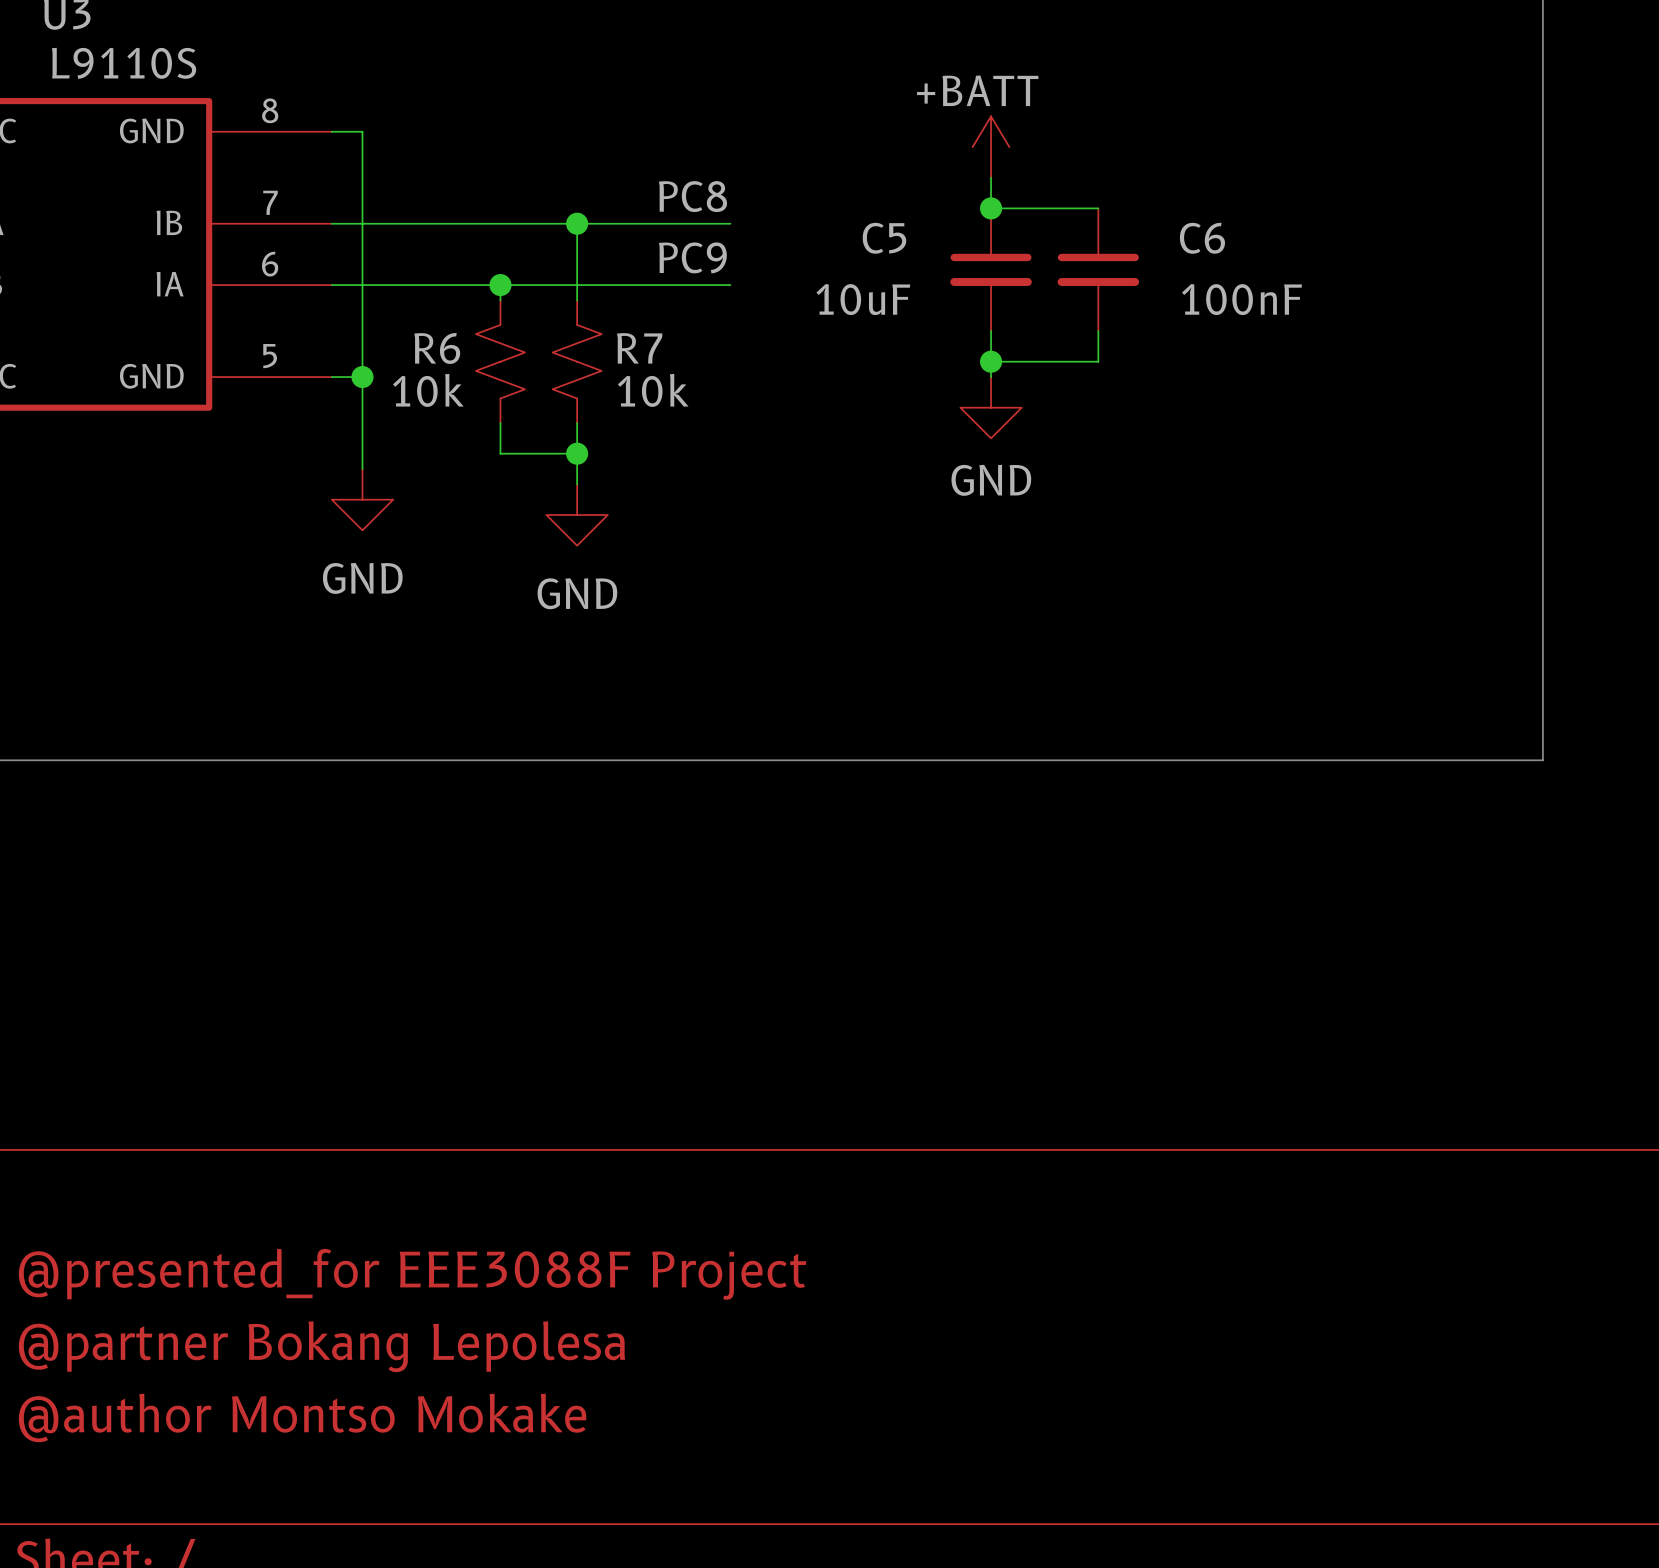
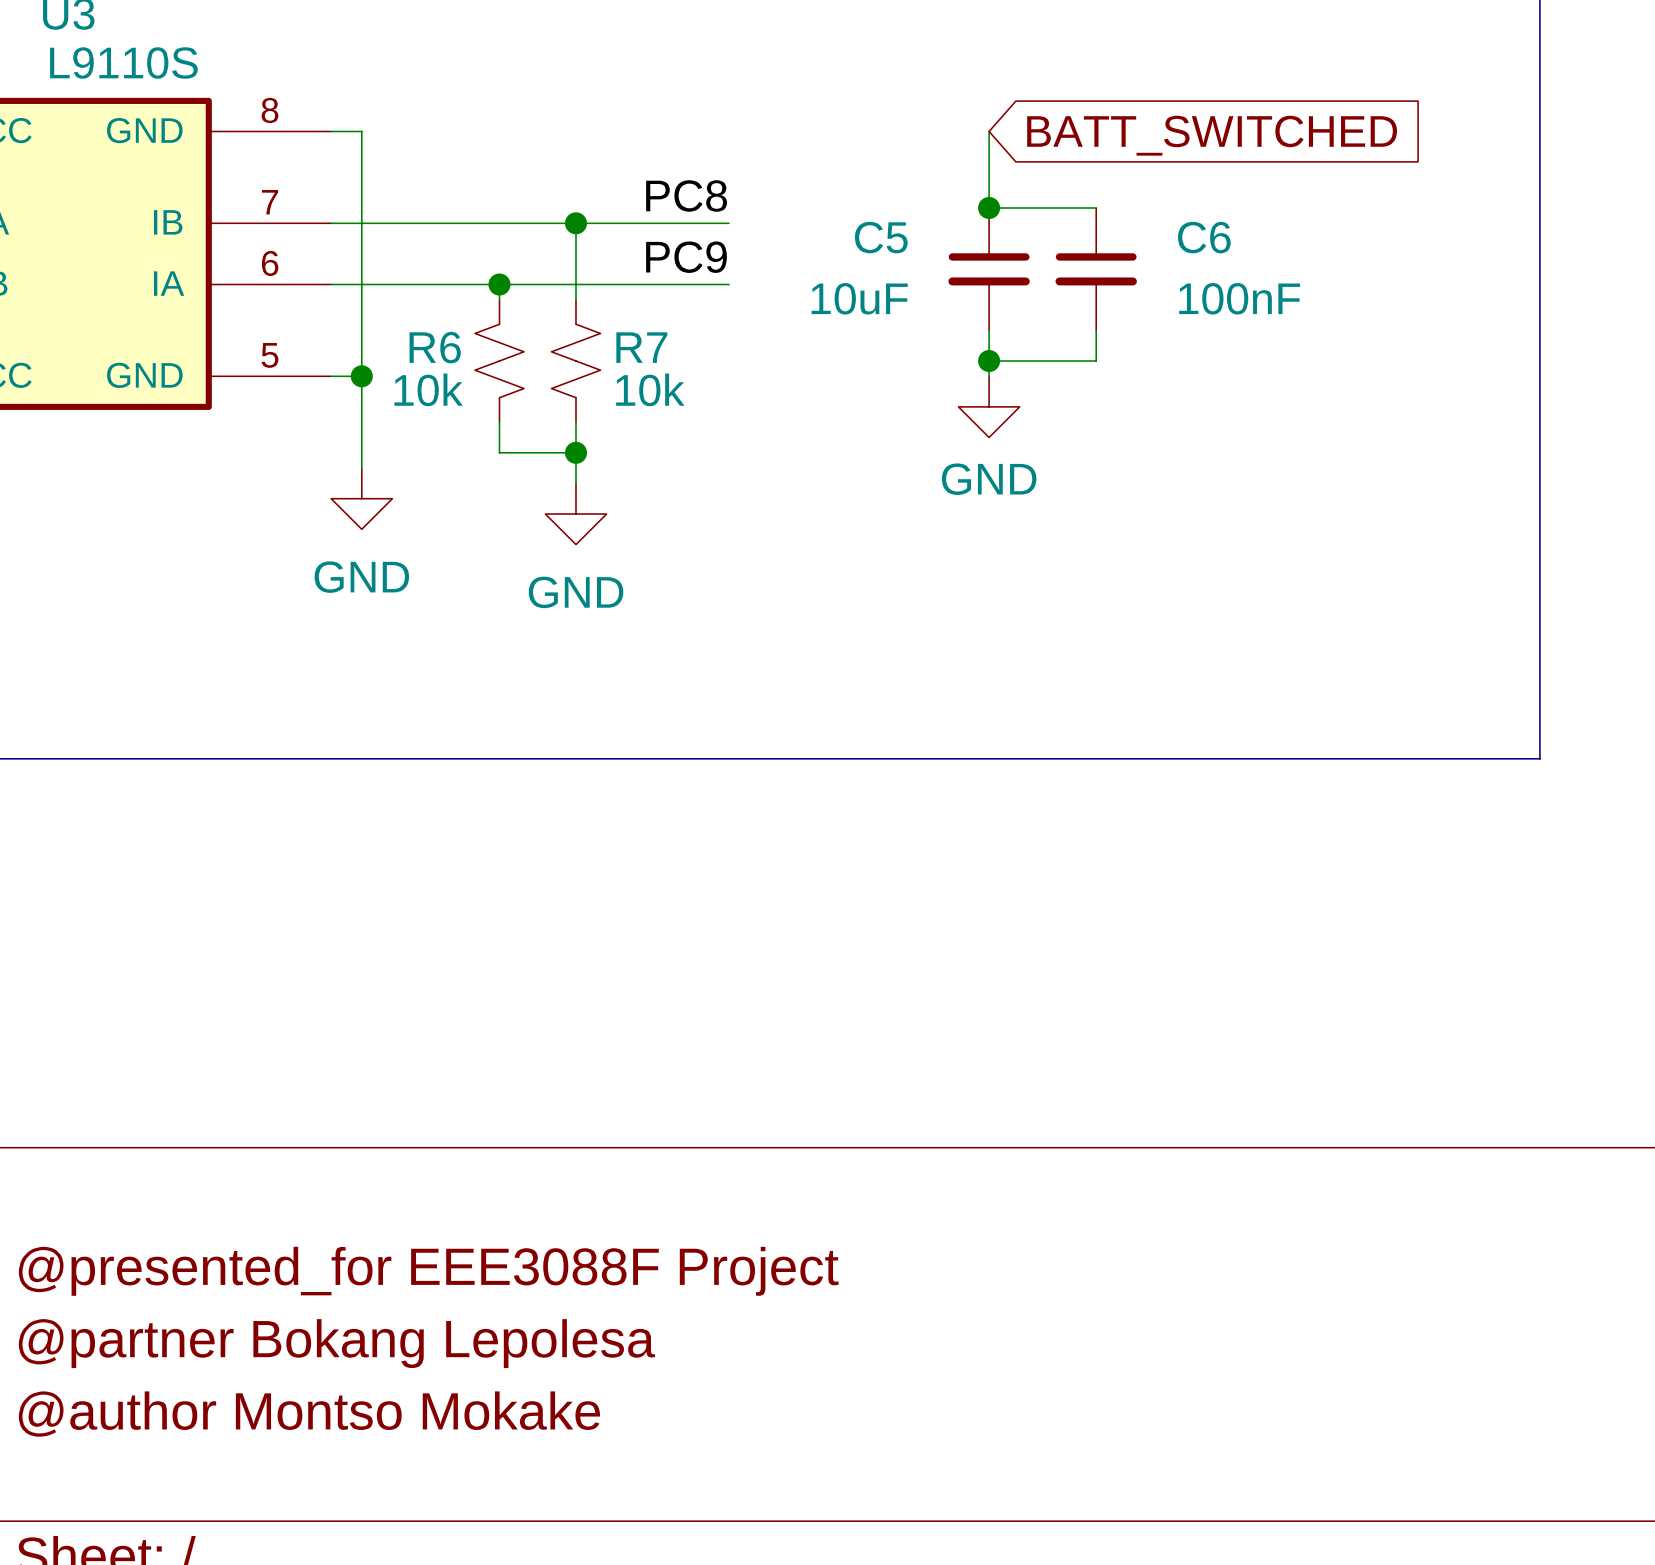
global label: none -> BATT_SWITCHED (1212, 135)
power symbol: +BATT (991, 147) -> none

